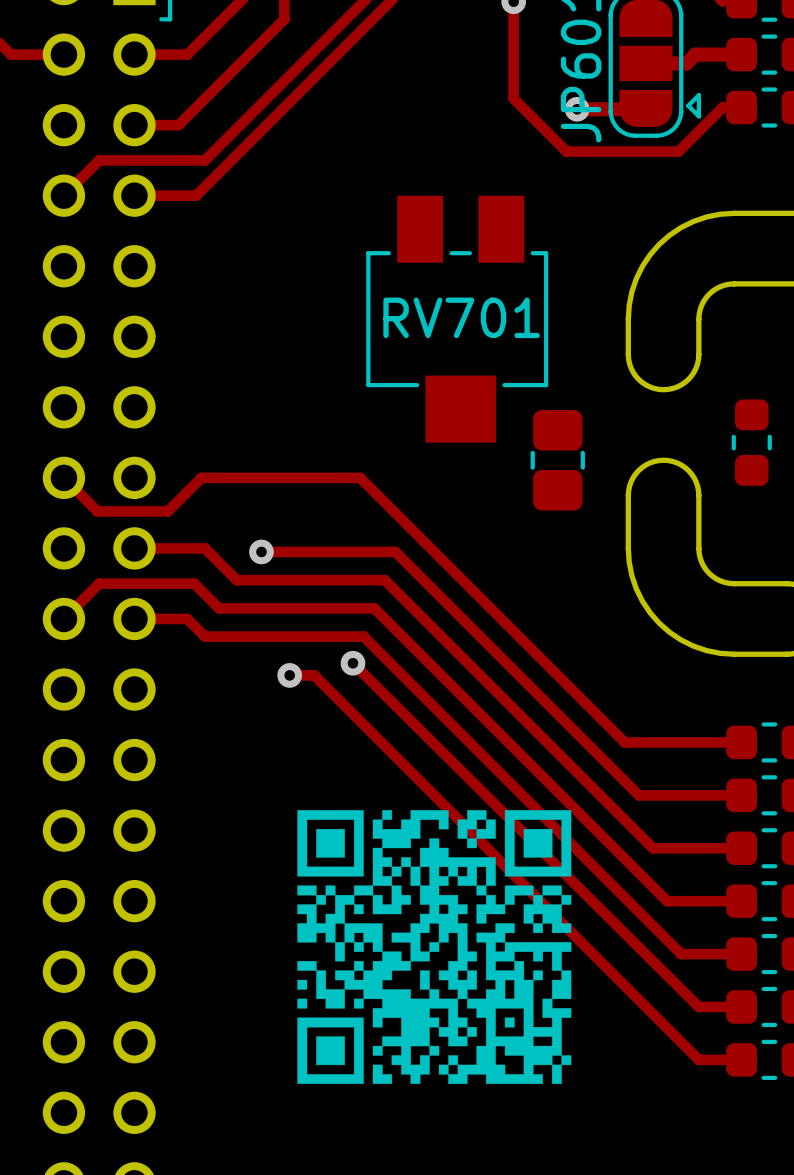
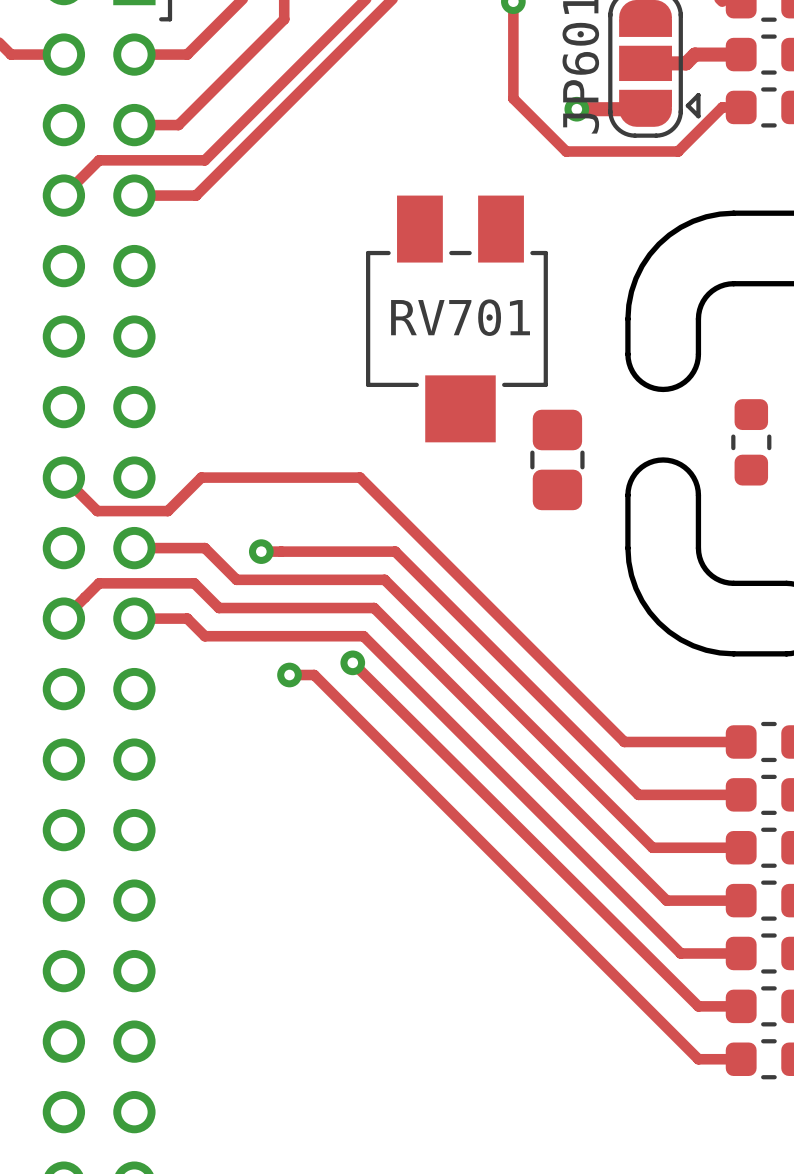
drawing: [297, 810, 572, 1084] -> none

